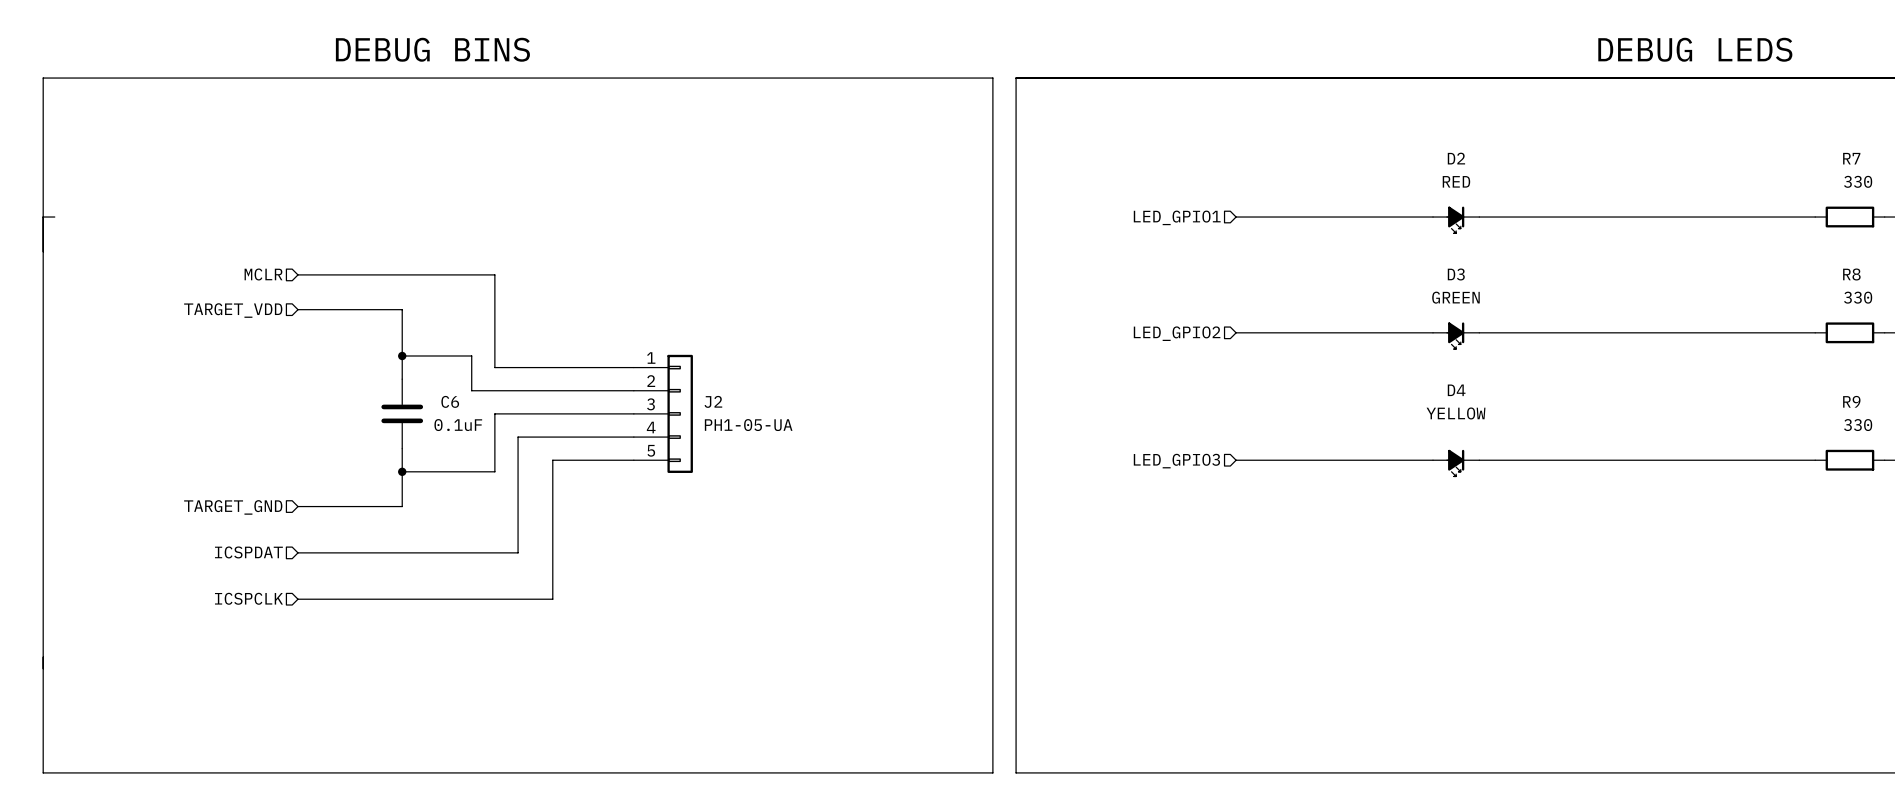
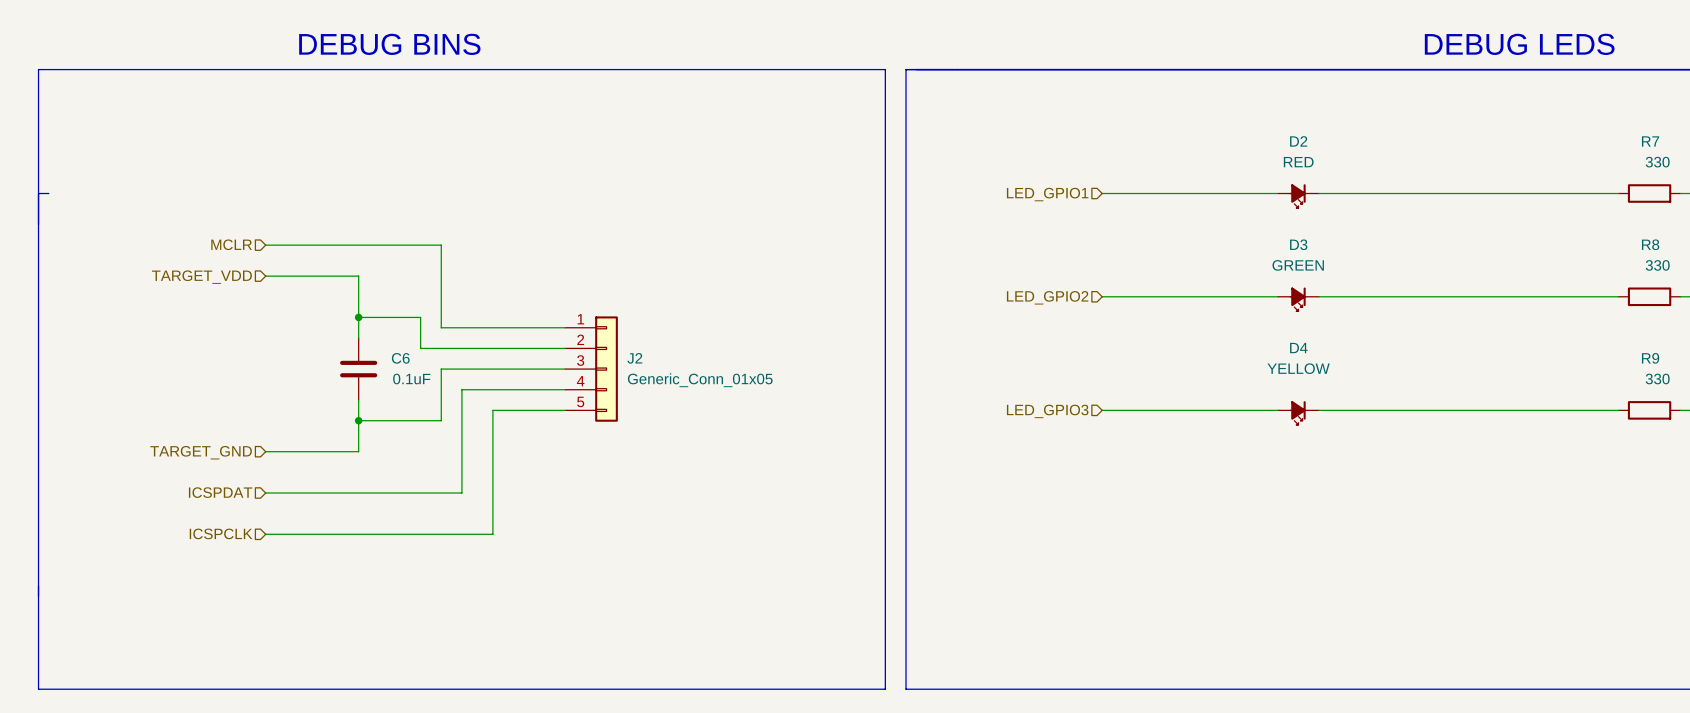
J2 value: PH1-05-UA (748, 425) -> Generic_Conn_01x05 (700, 380)

